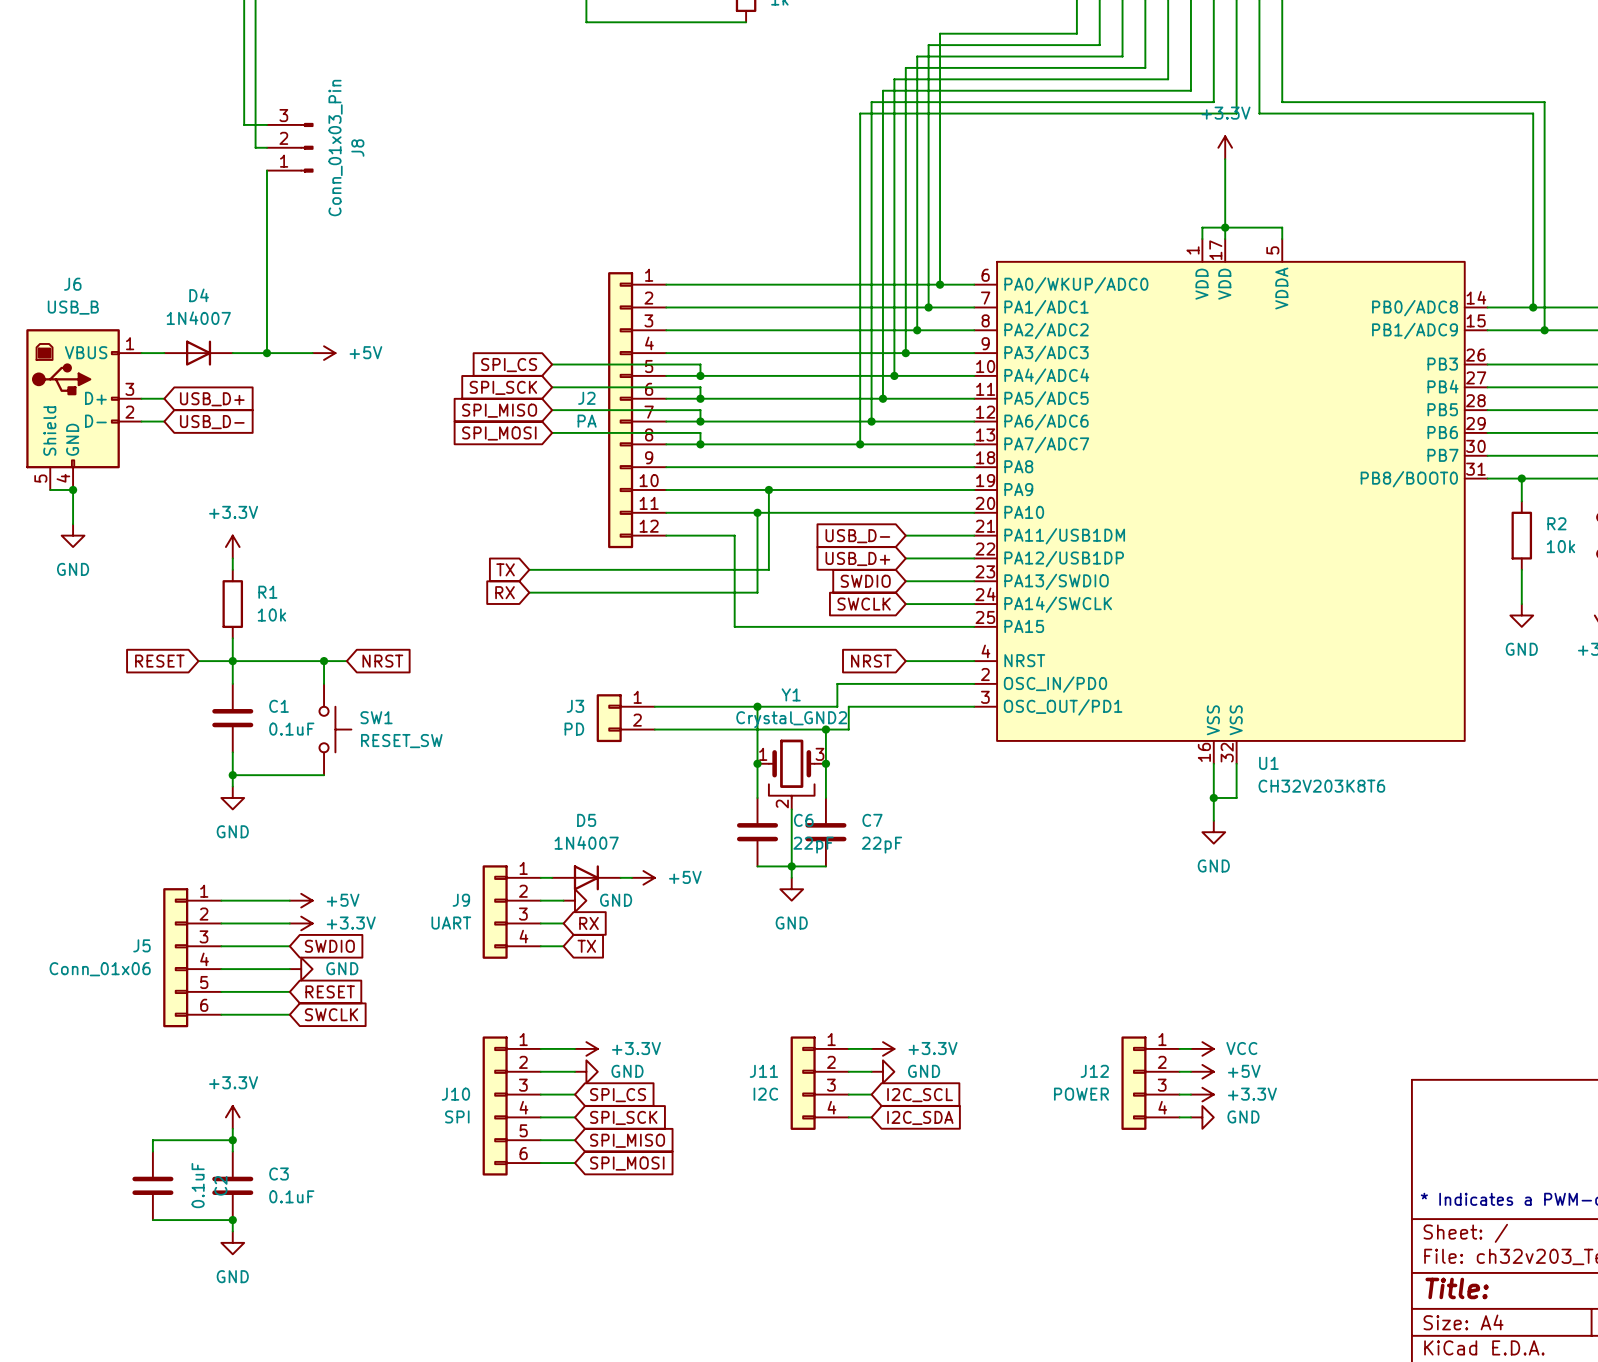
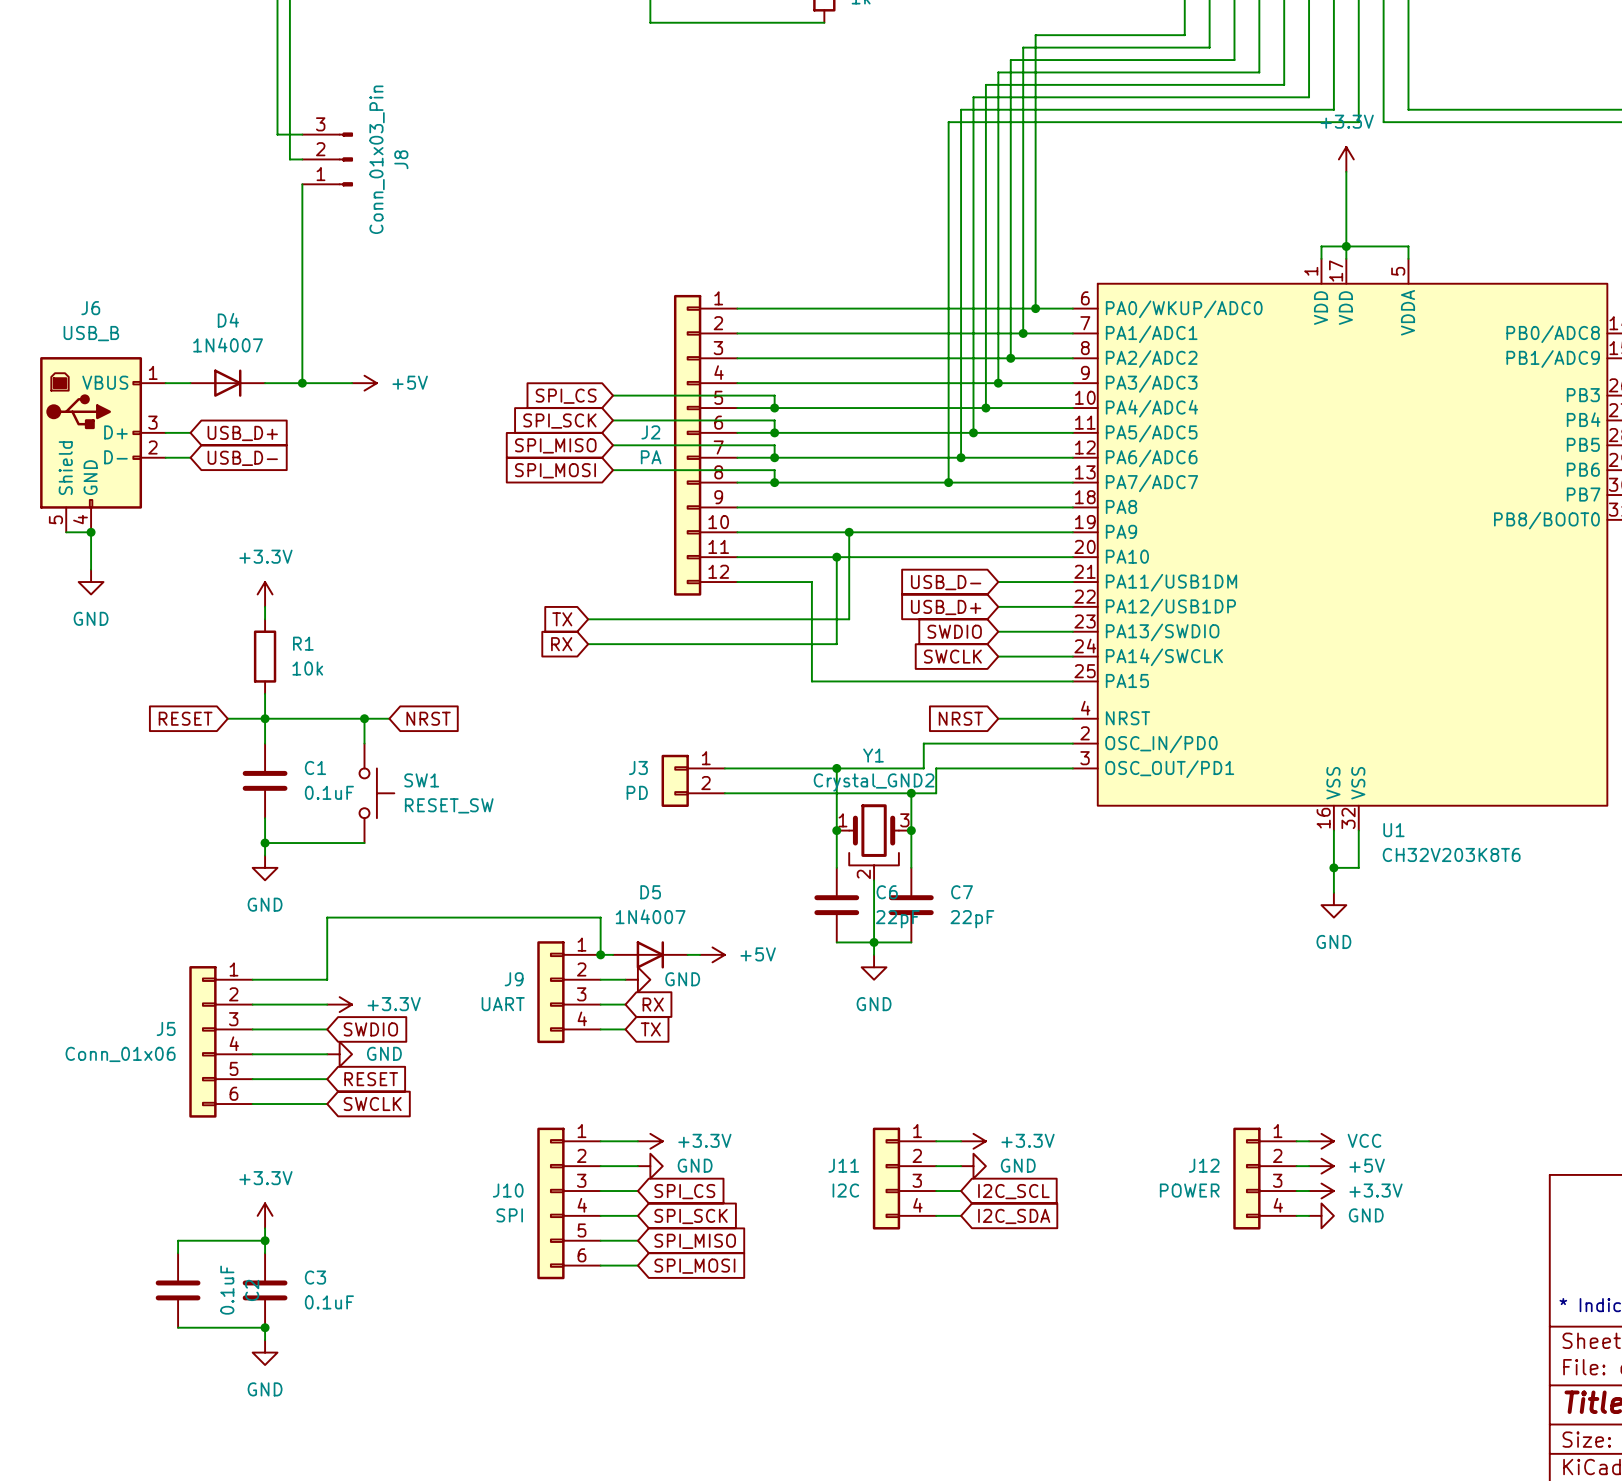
wire: none -> (600, 954) (600, 917) (327, 917) (327, 979)
junction: none -> (600, 954)
power symbol: +5V (301, 900) -> none

